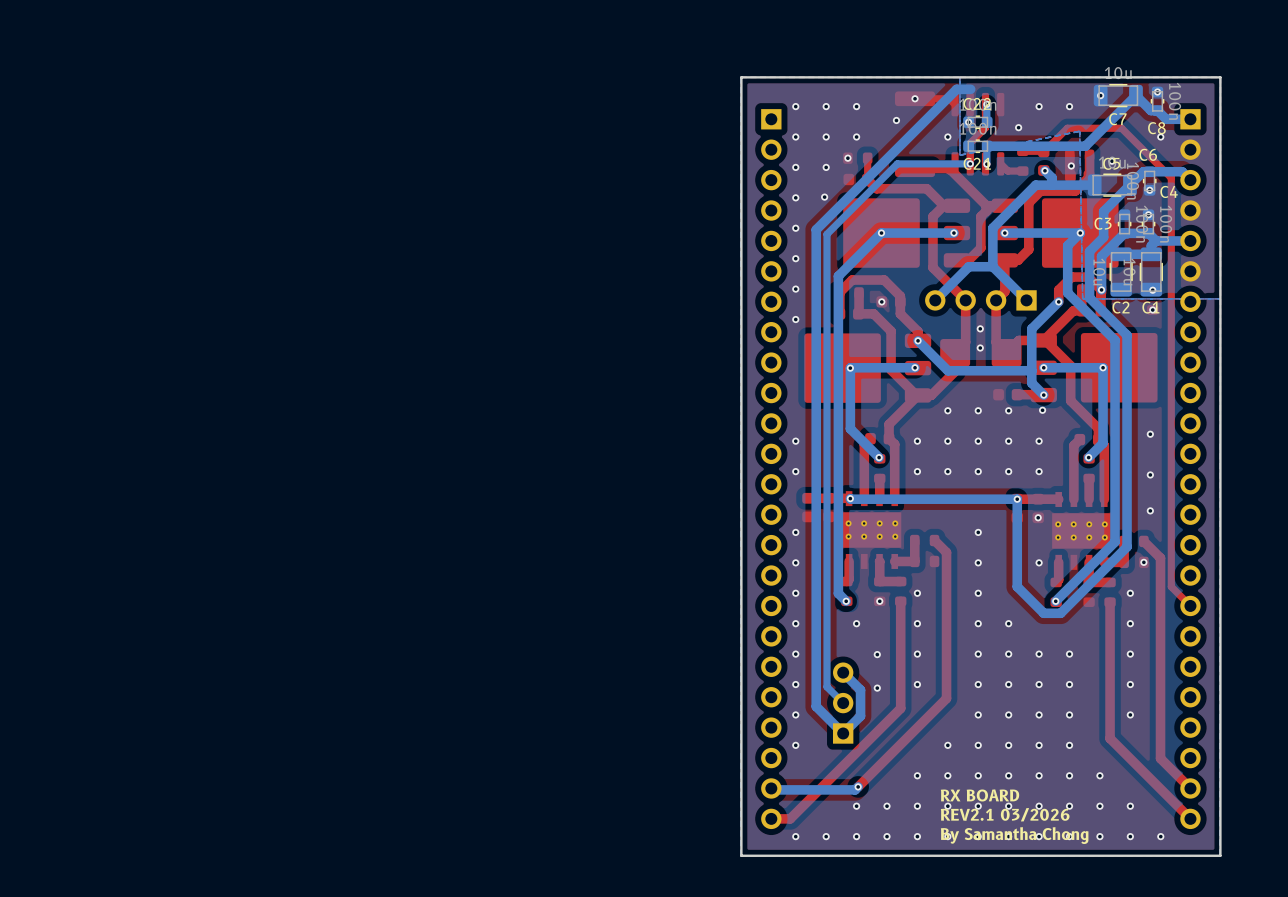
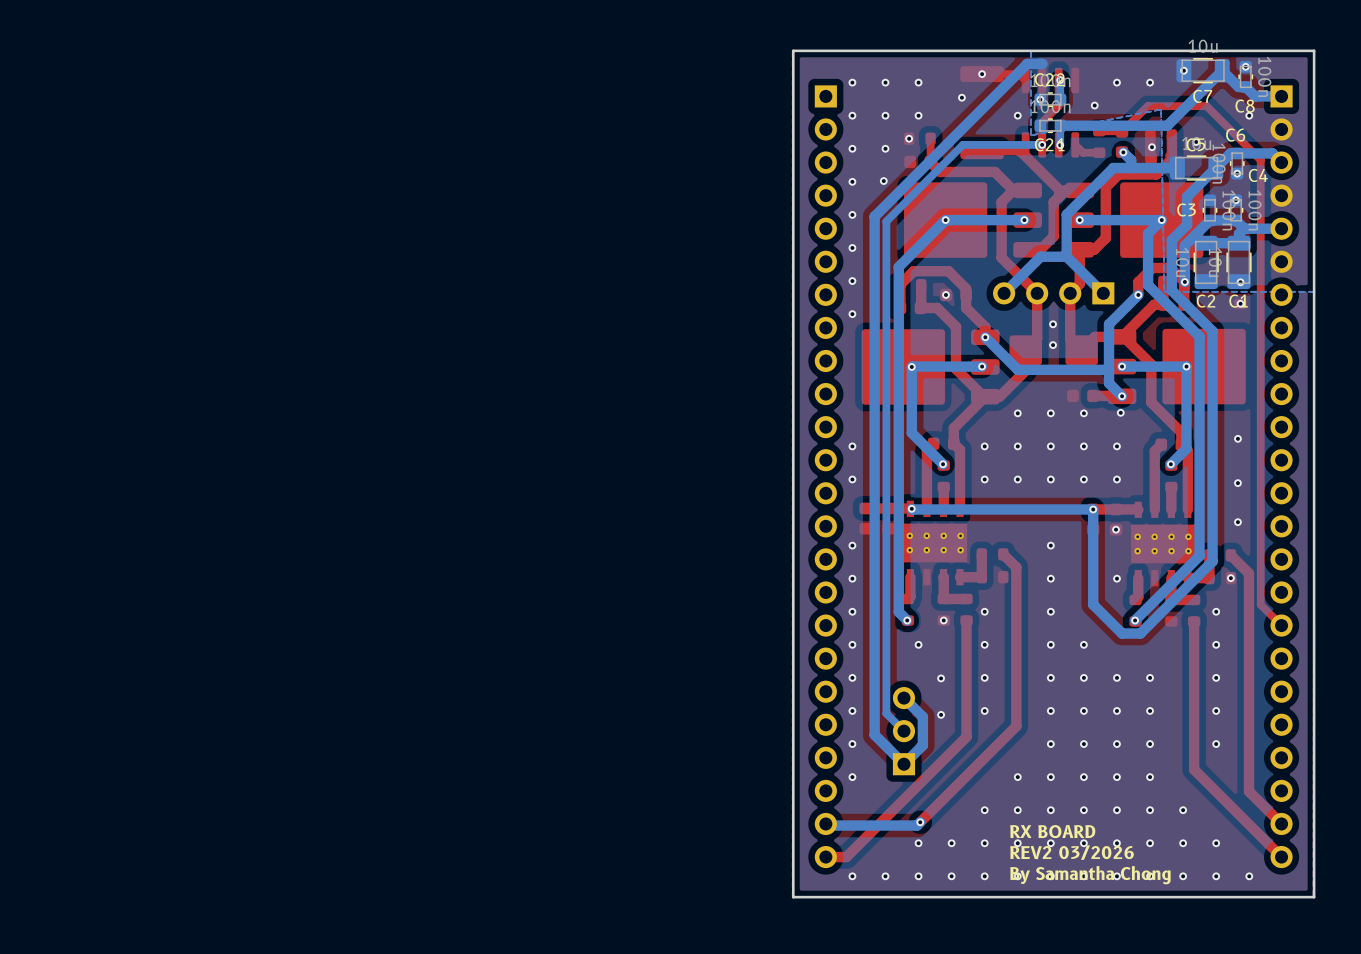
text: REV2.1 03/2026 (1005, 814) -> REV2 03/2026 (1072, 852)

